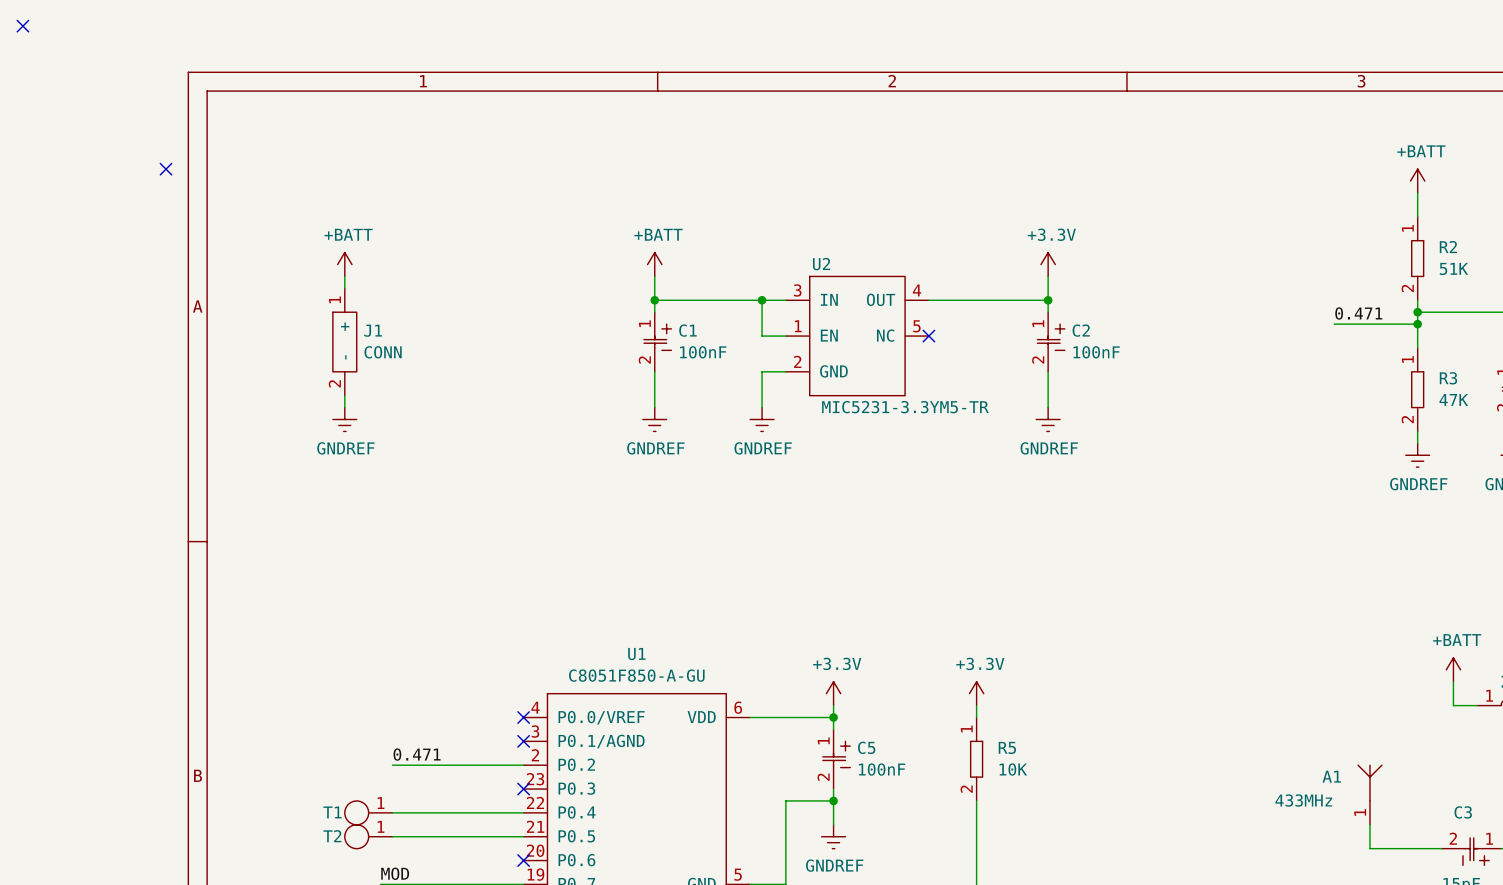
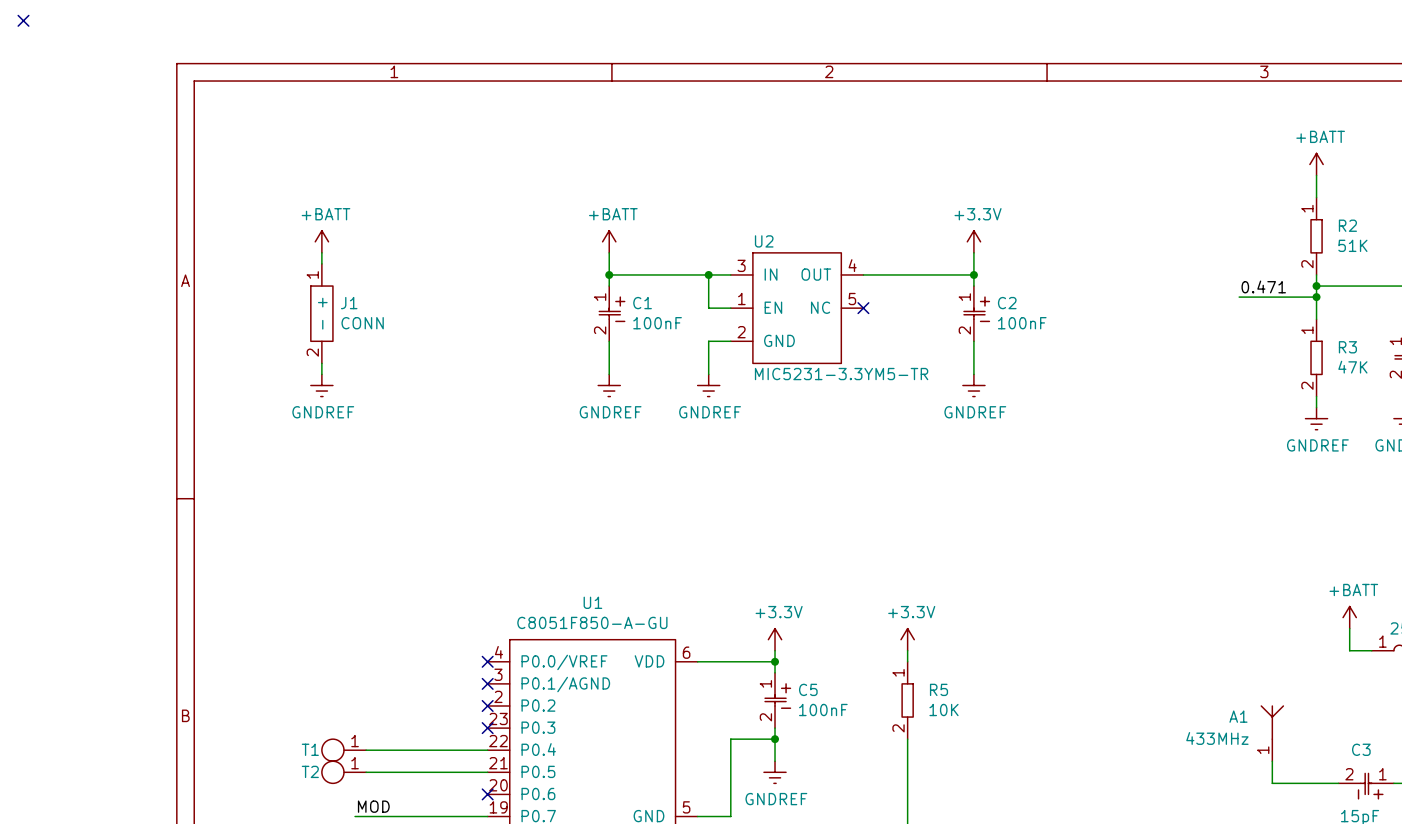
no-connect mark: (166, 169) -> none
label: 0.471 (417, 754) -> none
wire: (392, 765) (523, 765) -> none
no-connect mark: none -> (487, 706)

